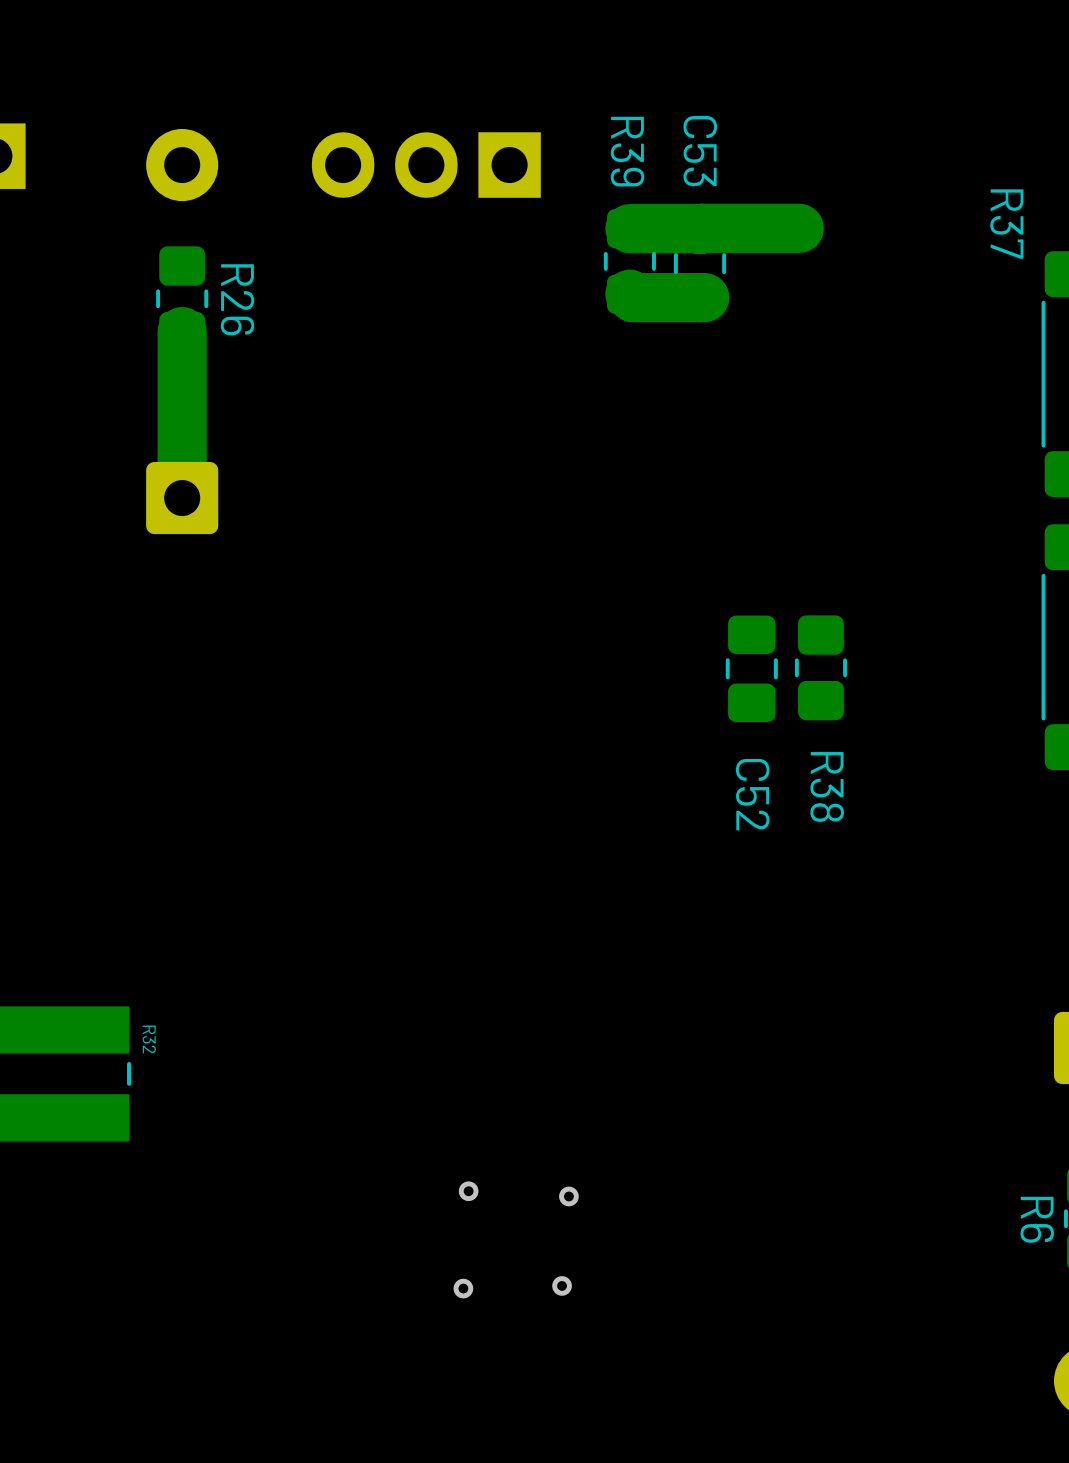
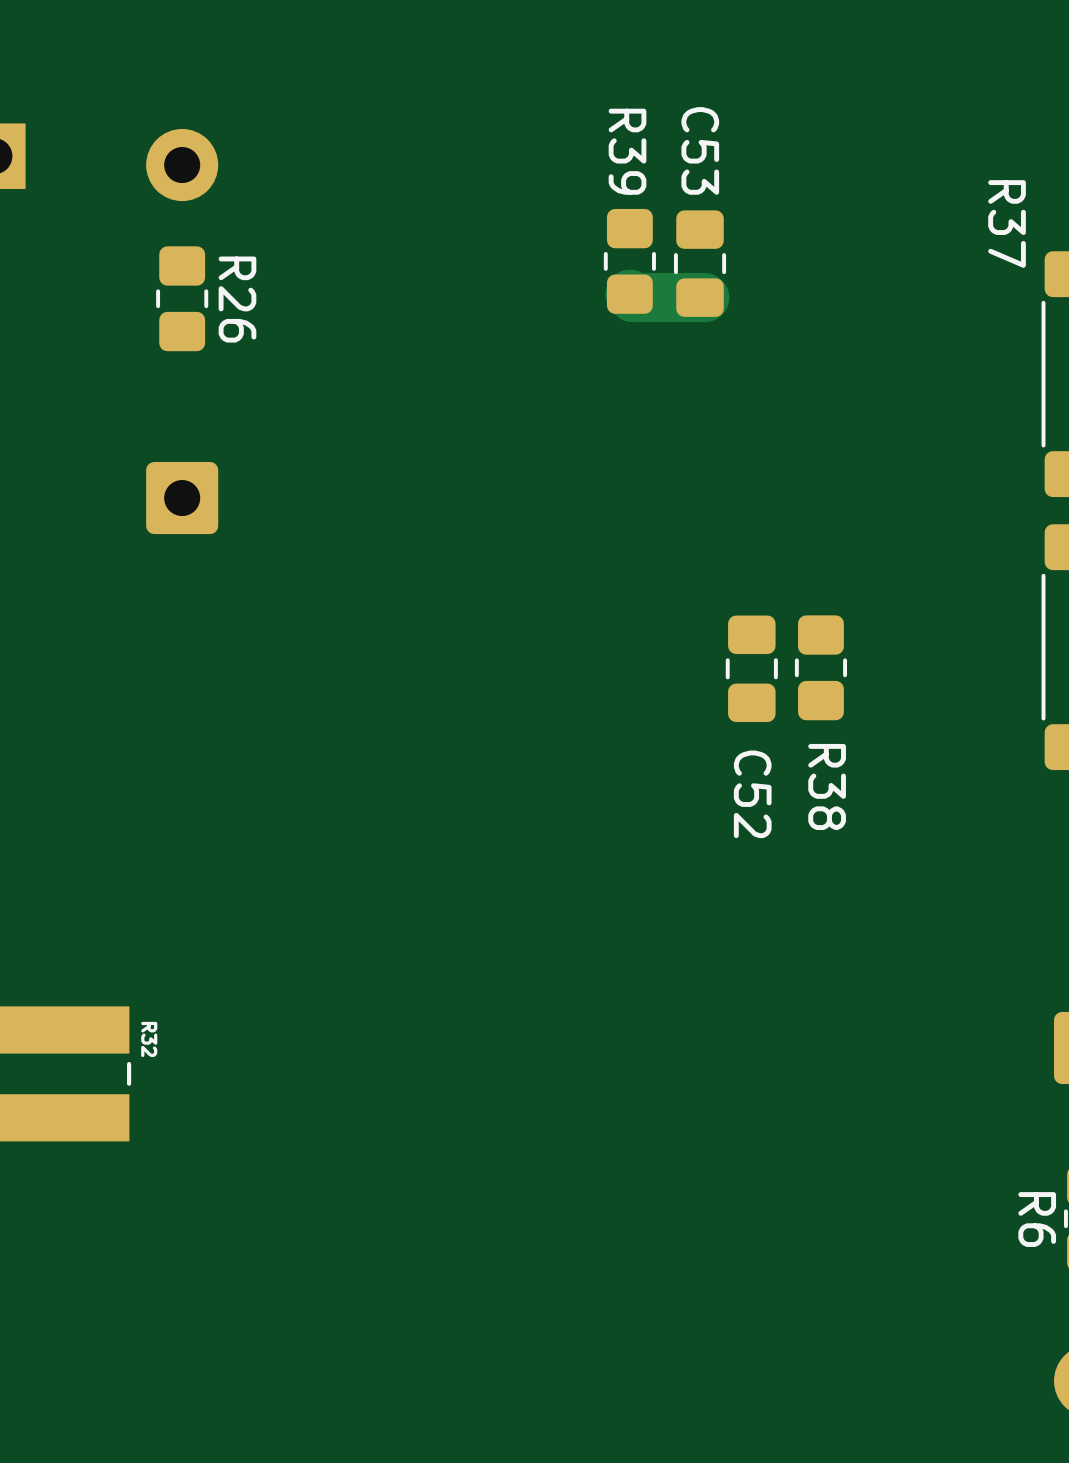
part: (426, 165) -> none
track: (799, 228) (629, 228) -> none
track: (182, 331) (182, 498) -> none
via: (468, 1191) -> none
via: (568, 1196) -> none
via: (562, 1285) -> none
via: (463, 1288) -> none

